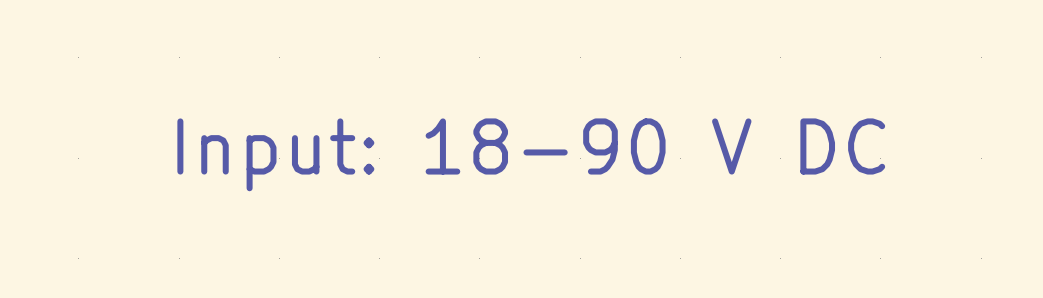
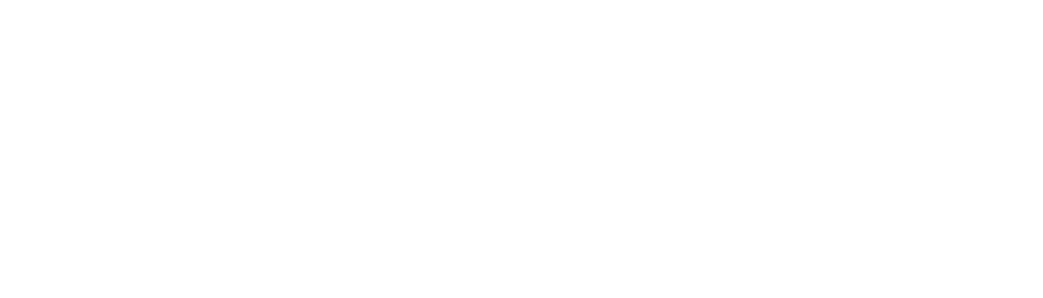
text: Input: 18-90 V DC (531, 154) -> none

